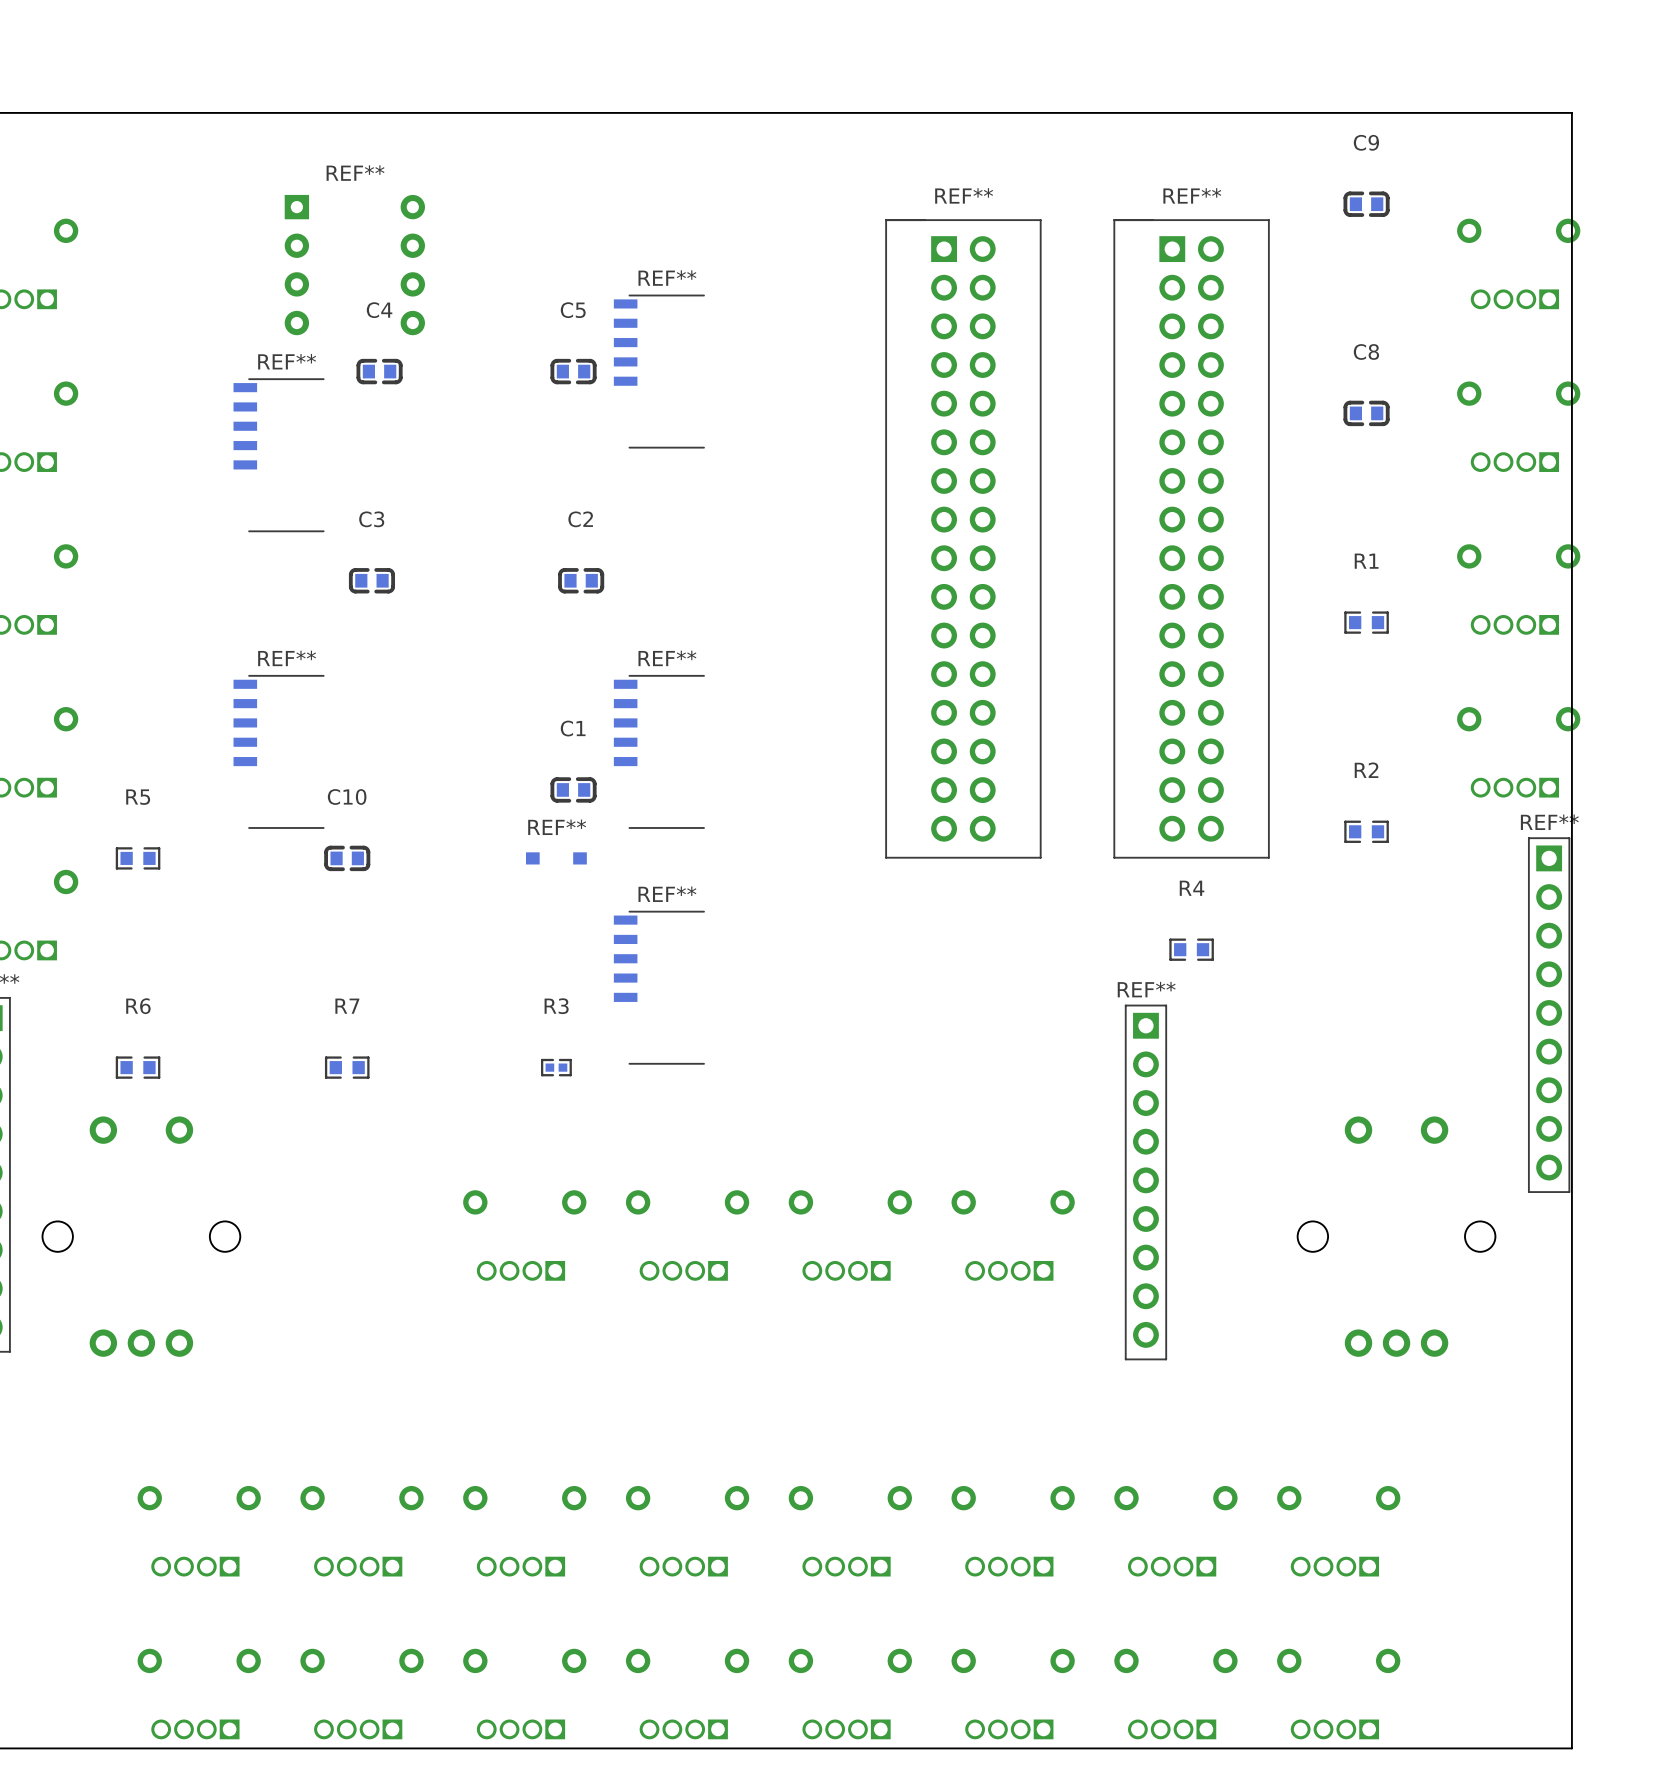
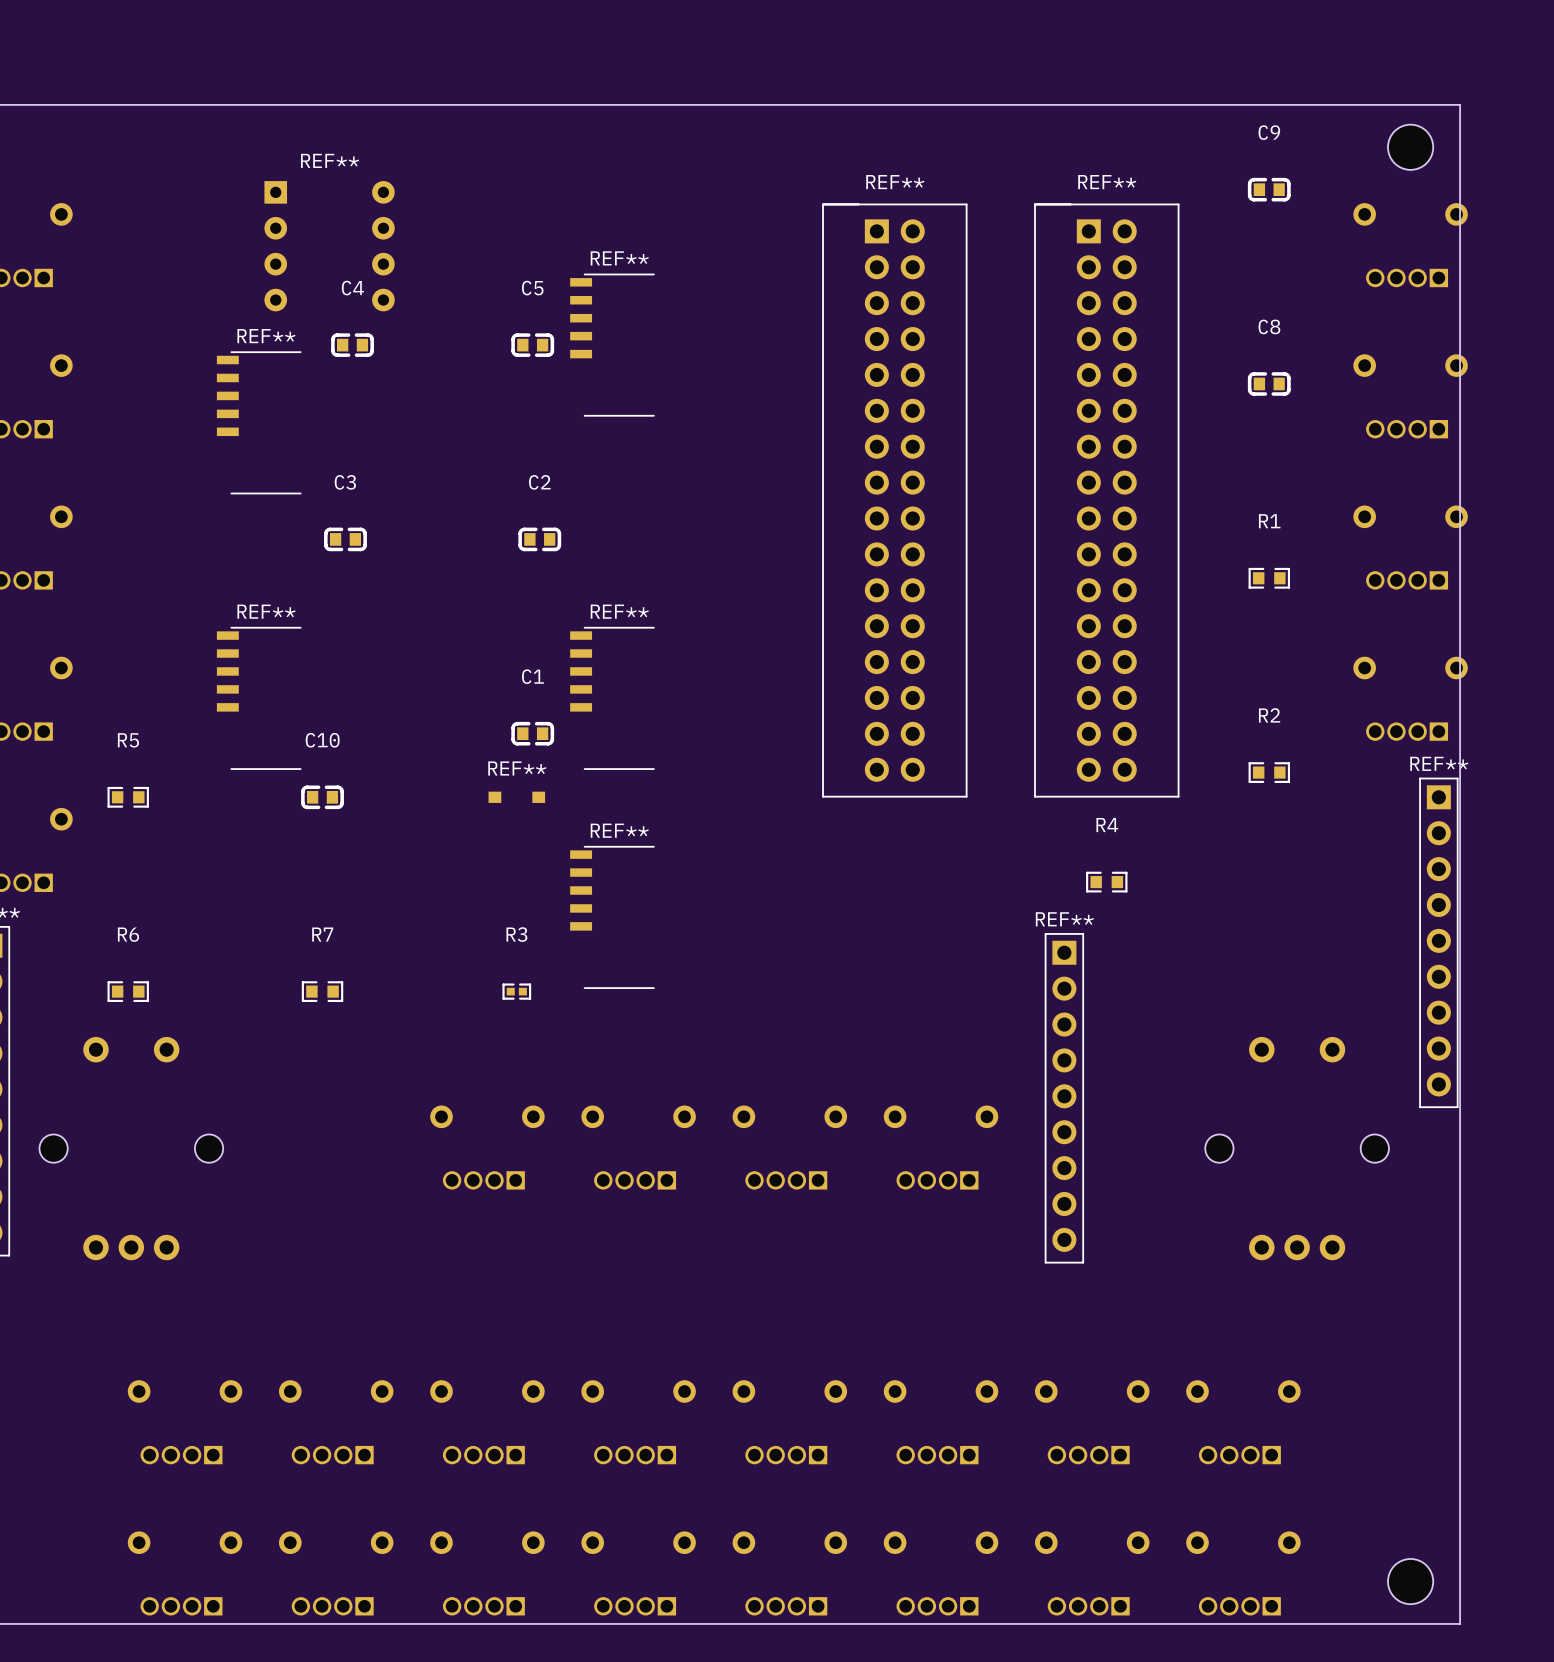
part: none -> (1410, 147)
part: none -> (1410, 1581)

